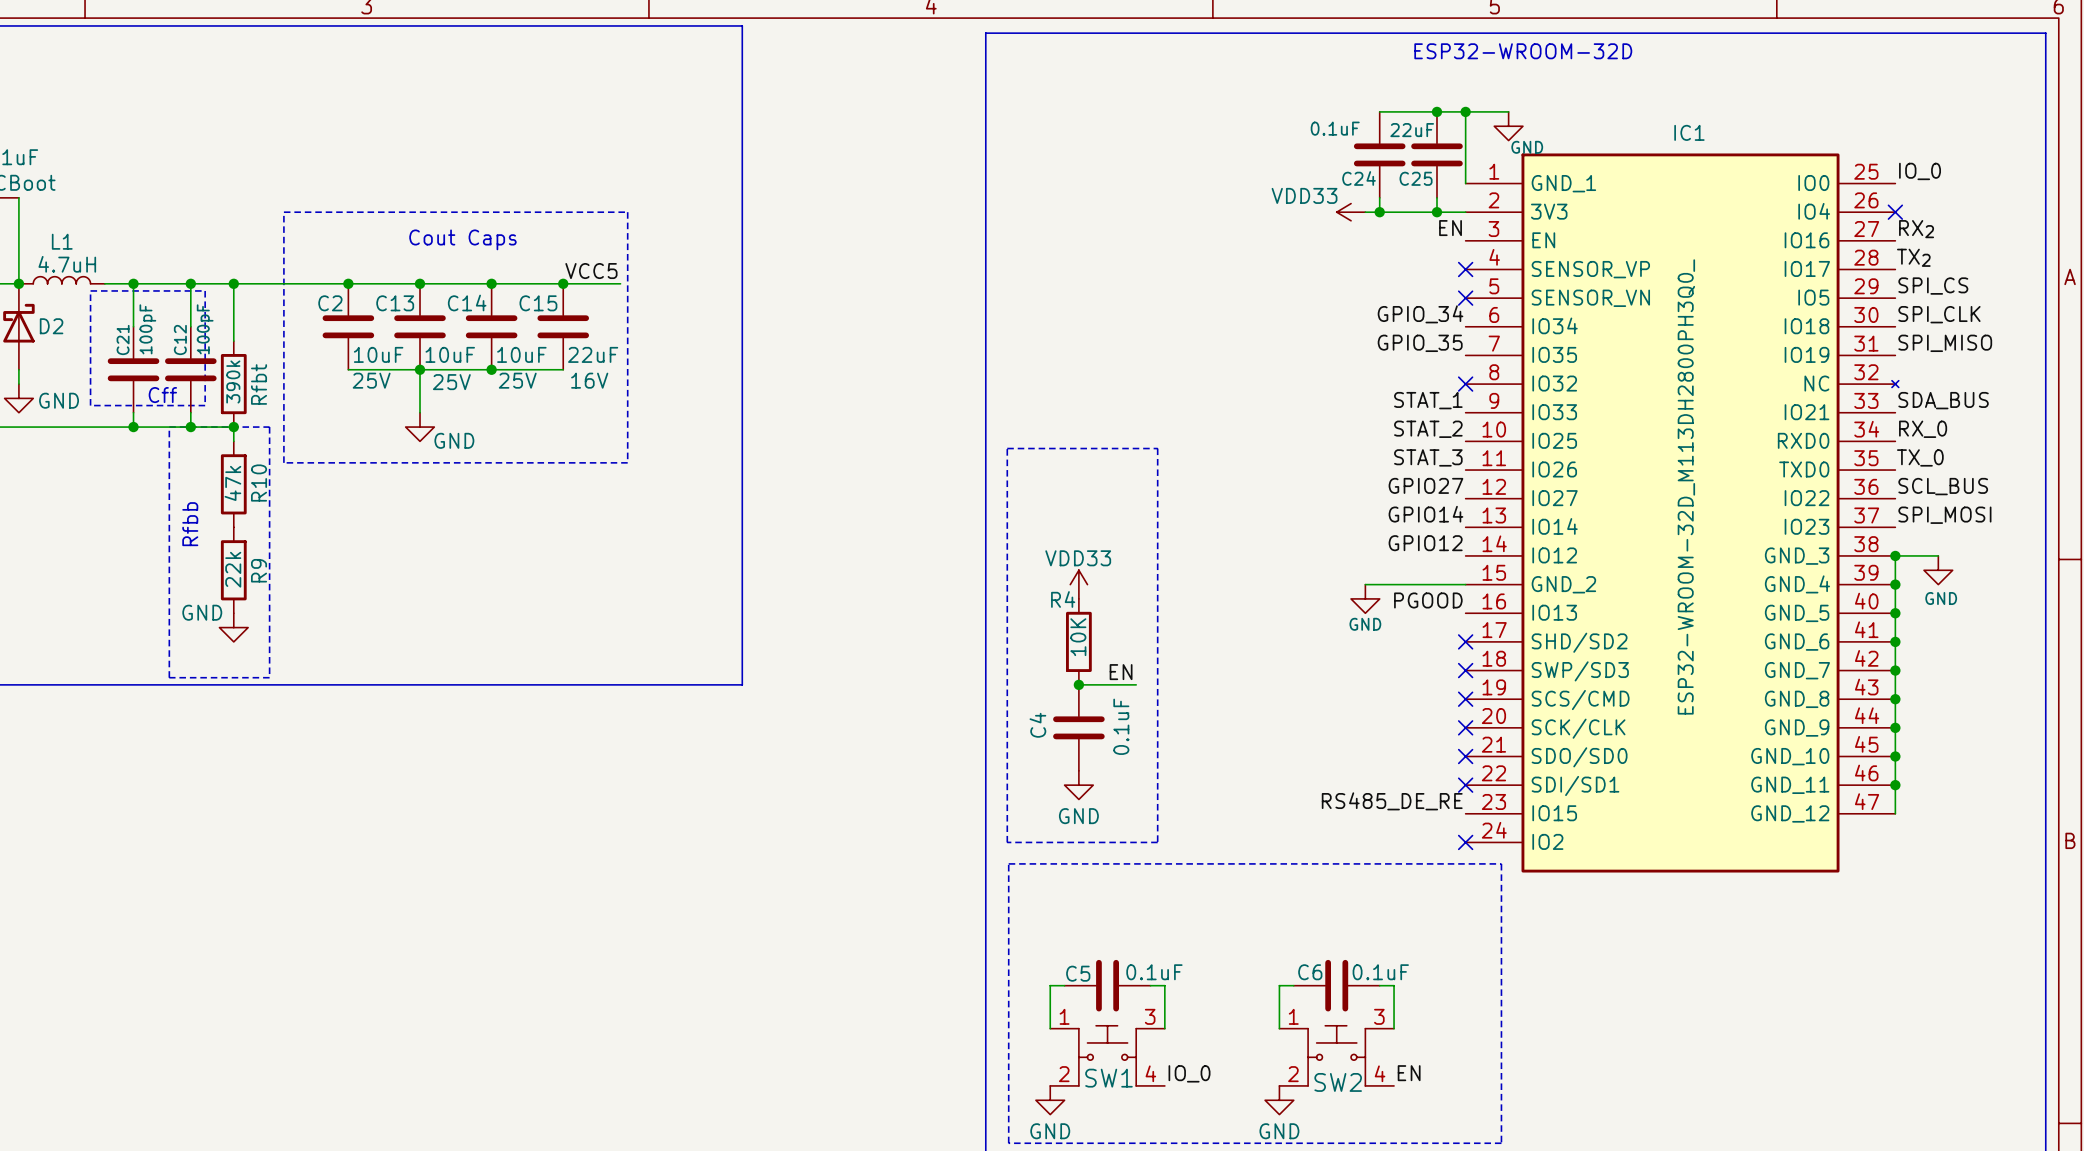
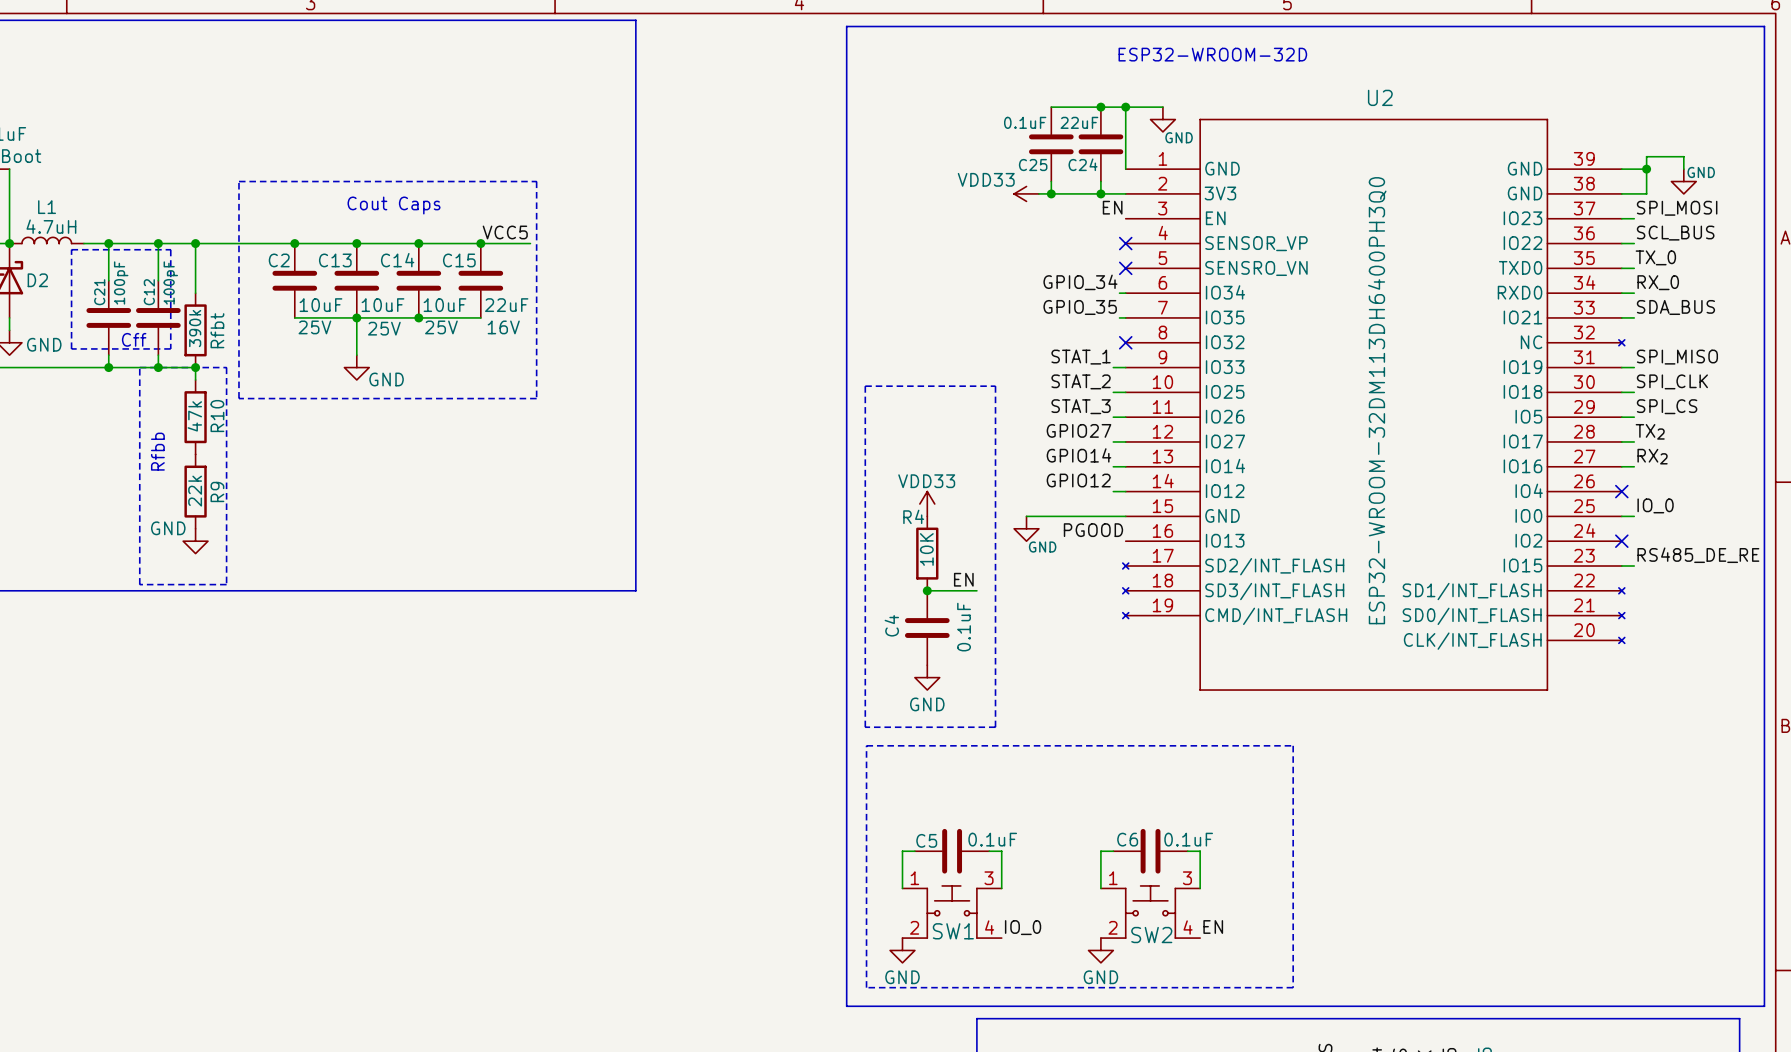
text position: ESP32-WROOM-32D (1523, 51) -> ESP32-WROOM-32D (1212, 54)
wire: (1379, 111) (1508, 111) -> (1051, 107) (1162, 107)
junction: (1436, 111) -> none
wire: (1465, 111) (1465, 183) -> (1125, 107) (1125, 169)
junction: (1465, 111) -> none
junction: none -> (1100, 107)
junction: none -> (1125, 107)
power symbol position: GND (1508, 126) -> GND (1162, 119)
C24 value: 0.1uF (1335, 128) -> 22uF (1079, 122)
C25 value: 22uF (1412, 130) -> 0.1uF (1025, 122)
C24 position: (1379, 154) -> (1100, 144)
C25 position: (1436, 154) -> (1051, 144)
label: IO_0 (1920, 171) -> none
wire: (1379, 197) (1379, 212) -> (1051, 181) (1051, 193)
wire: (1436, 197) (1436, 212) -> (1100, 181) (1100, 193)
wire: none -> (1621, 169) (1646, 169)
junction: none -> (1646, 169)
wire: none -> (1683, 169) (1683, 156) (1646, 156) (1646, 193) (1621, 193)
power symbol position: VDD33 (1351, 212) -> VDD33 (1026, 193)
wire: (1365, 212) (1465, 212) -> (1038, 193) (1125, 193)
junction: (1379, 212) -> none
junction: (1436, 212) -> none
no-connect mark: (1895, 212) -> none
power symbol: none -> GND (1683, 181)
junction: none -> (1051, 193)
junction: none -> (1100, 193)
label position: EN (1450, 228) -> EN (1112, 207)
label: RX2 (1916, 229) -> none
wire: none -> (1621, 218) (1634, 218)
label position: TX2 (1913, 257) -> TX2 (1650, 431)
no-connect mark: (1465, 269) -> none
no-connect mark: none -> (1125, 243)
wire: none -> (1621, 243) (1634, 243)
label position: SPI_CS (1933, 286) -> SPI_CS (1667, 406)
no-connect mark: (1465, 298) -> none
no-connect mark: none -> (1125, 268)
wire: none -> (1621, 268) (1634, 268)
label position: GPIO_34 (1420, 314) -> GPIO_34 (1080, 282)
label position: SPI_CLK (1939, 314) -> SPI_CLK (1672, 381)
wire: none -> (1119, 293) (1125, 293)
wire: none -> (1621, 293) (1634, 293)
label position: GPIO_35 (1420, 343) -> GPIO_35 (1080, 307)
label position: SPI_MISO (1945, 343) -> SPI_MISO (1677, 357)
wire: none -> (1119, 317) (1125, 317)
wire: none -> (1621, 317) (1634, 317)
no-connect mark: (1465, 384) -> none
no-connect mark: none -> (1125, 342)
label position: STAT_1 (1428, 400) -> STAT_1 (1081, 357)
label position: SDA_BUS (1943, 400) -> SDA_BUS (1675, 307)
wire: none -> (1113, 367) (1125, 367)
wire: none -> (1621, 367) (1634, 367)
label position: STAT_2 (1428, 429) -> STAT_2 (1081, 381)
label position: RX_0 (1923, 429) -> RX_0 (1658, 282)
wire: none -> (1113, 392) (1125, 392)
wire: none -> (1621, 392) (1634, 392)
label position: STAT_3 (1428, 457) -> STAT_3 (1081, 406)
label position: TX_0 (1920, 457) -> TX_0 (1655, 257)
U2: none -> ESP32-WROOM-32DM113DH6400PH3Q0 (1373, 404)
wire: none -> (1113, 417) (1125, 417)
wire: none -> (1621, 417) (1634, 417)
label position: GPIO27 (1425, 485) -> GPIO27 (1078, 430)
label position: SCL_BUS (1943, 486) -> SCL_BUS (1675, 233)
wire: none -> (1113, 441) (1125, 441)
IC1: ESP32-WROOM-32D_M113DH2800PH3Q0_ (1682, 512) -> none
wire: none -> (1621, 441) (1634, 441)
label position: GPIO14 (1425, 514) -> GPIO14 (1078, 455)
label position: SPI_MOSI (1944, 515) -> SPI_MOSI (1677, 208)
label: none -> RX2 (1652, 456)
wire: none -> (1113, 466) (1125, 466)
wire: none -> (1621, 466) (1634, 466)
label position: GPIO12 (1425, 543) -> GPIO12 (1078, 480)
junction: (1895, 555) -> none
wire: (1938, 555) (1895, 555) (1895, 813) -> none
wire: none -> (1113, 491) (1125, 491)
no-connect mark: none -> (1621, 491)
power symbol: GND (1938, 570) -> none
wire: (1365, 584) (1465, 584) -> none
junction: (1895, 584) -> none
label: none -> IO_0 (1655, 505)
wire: none -> (1026, 516) (1125, 516)
power symbol position: GND (1365, 598) -> GND (1026, 528)
wire: none -> (1621, 516) (1634, 516)
label position: PGOOD (1428, 600) -> PGOOD (1093, 530)
junction: (1895, 613) -> none
power symbol text position: GND (1365, 624) -> GND (1042, 547)
no-connect mark: none -> (1621, 541)
no-connect mark: (1465, 641) -> none
junction: (1895, 641) -> none
label: none -> RS485_DE_RE (1698, 555)
wire: none -> (1621, 566) (1634, 566)
no-connect mark: (1465, 670) -> none
junction: (1895, 670) -> none
no-connect mark: (1465, 699) -> none
junction: (1895, 699) -> none
no-connect mark: (1465, 727) -> none
junction: (1895, 727) -> none
no-connect mark: (1465, 756) -> none
junction: (1895, 756) -> none
no-connect mark: (1465, 785) -> none
junction: (1895, 785) -> none
label: RS485_DE_RE (1392, 801) -> none
no-connect mark: (1465, 842) -> none

